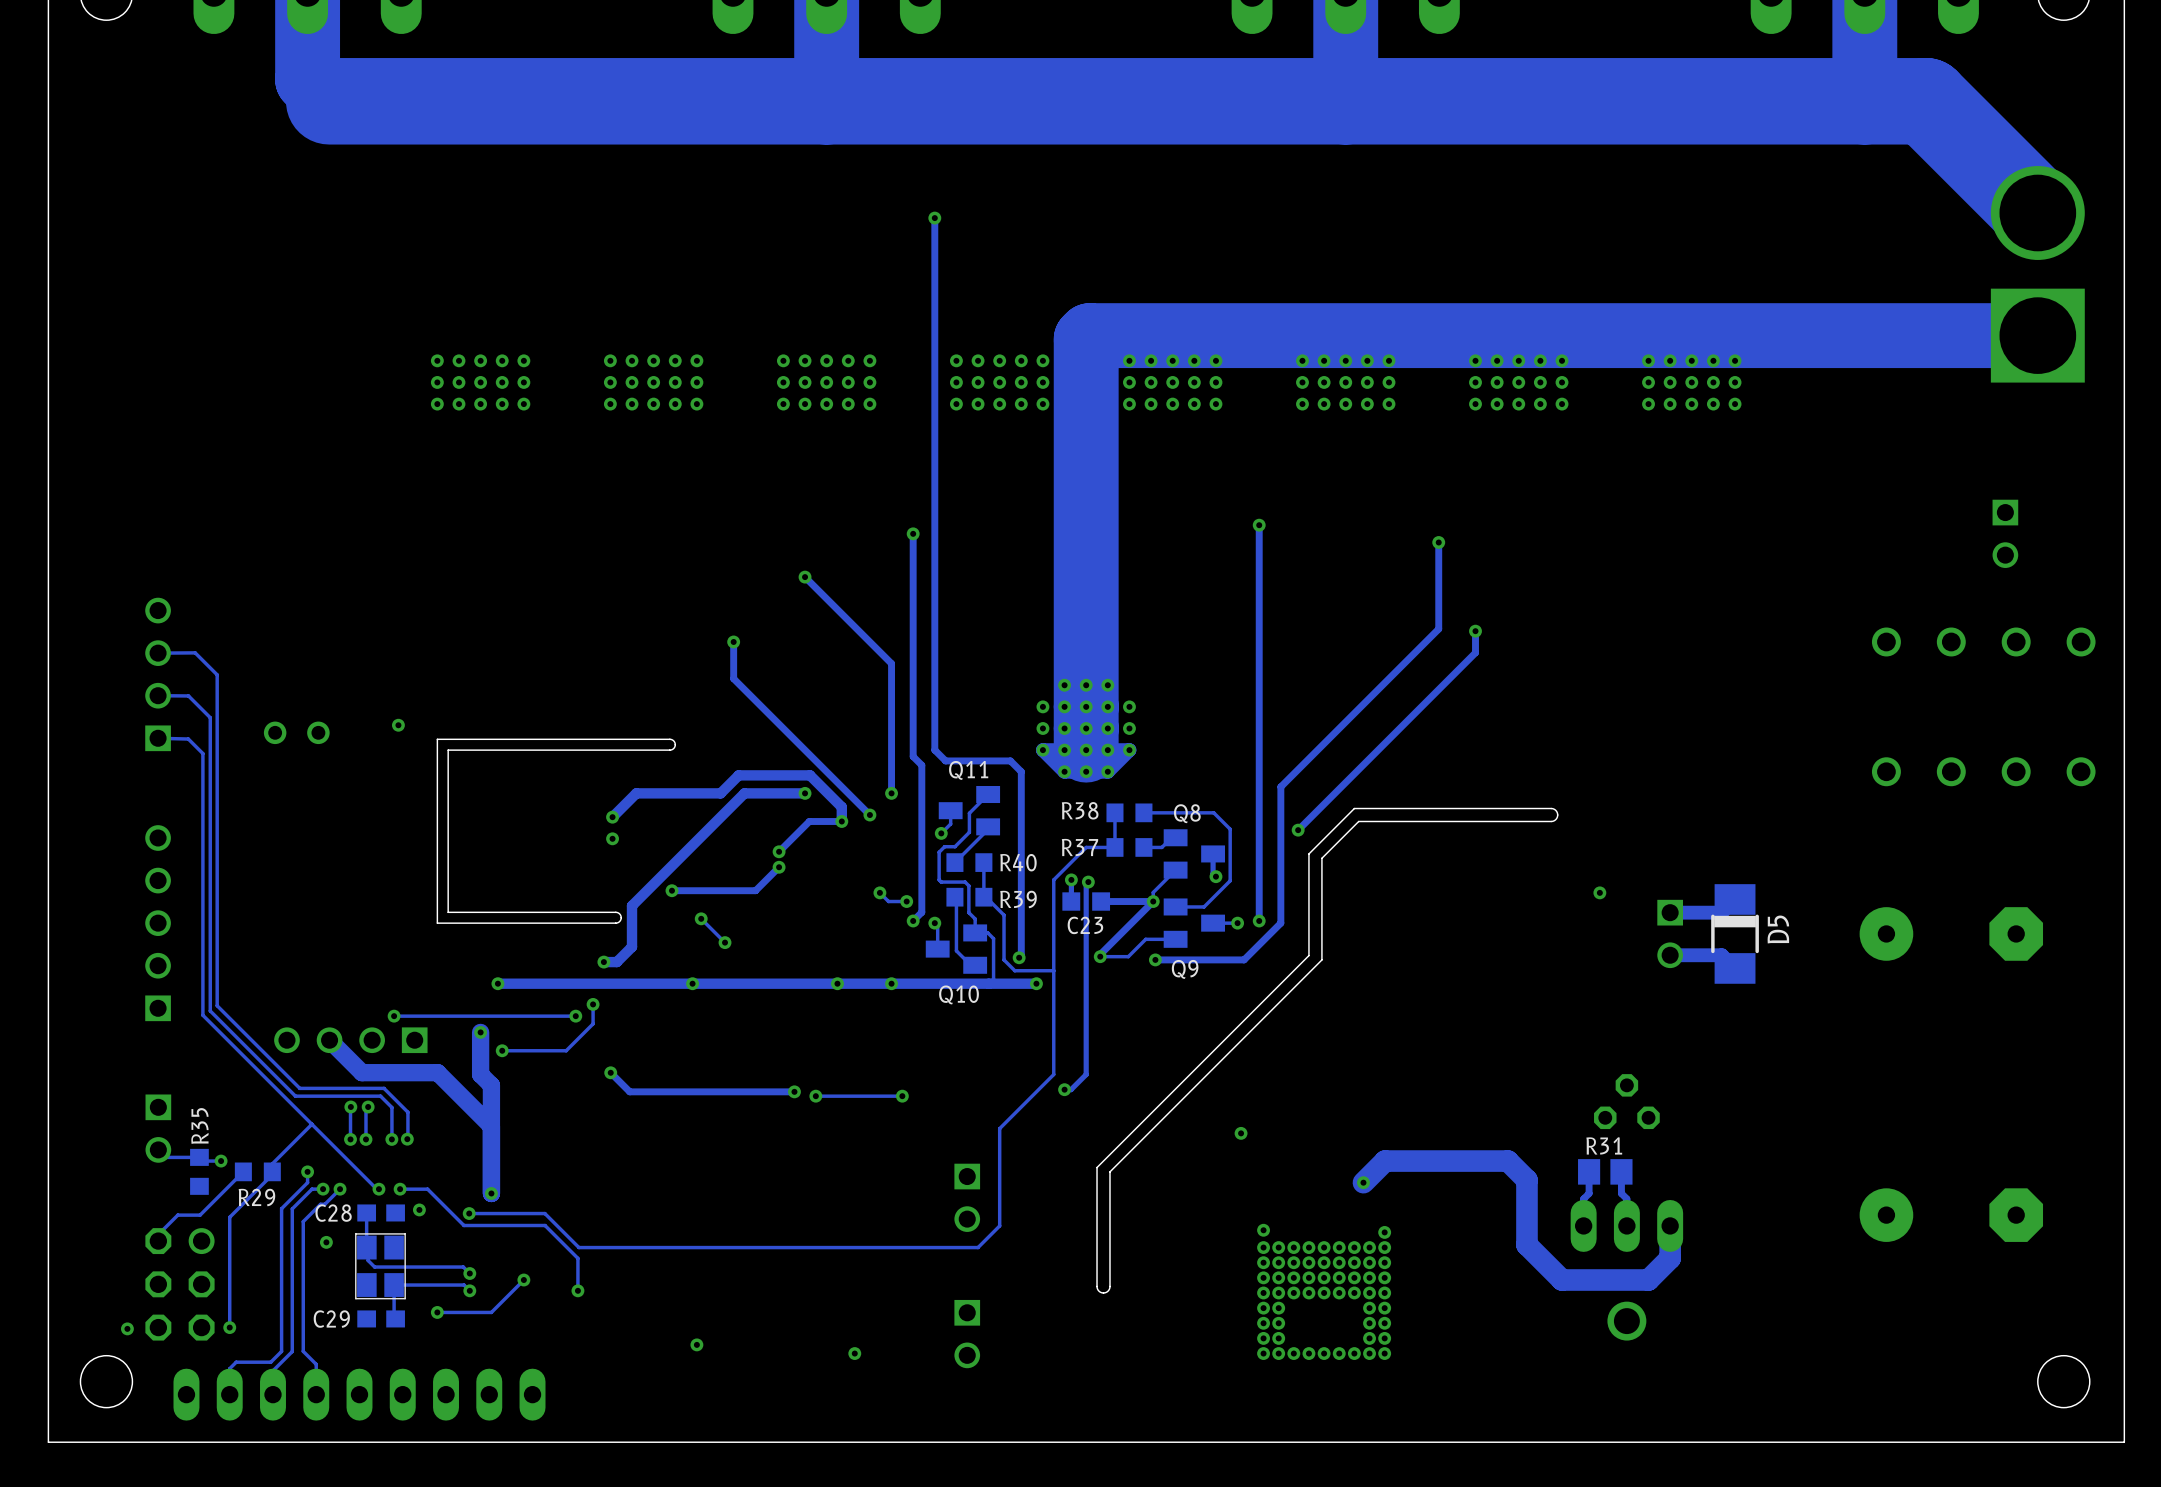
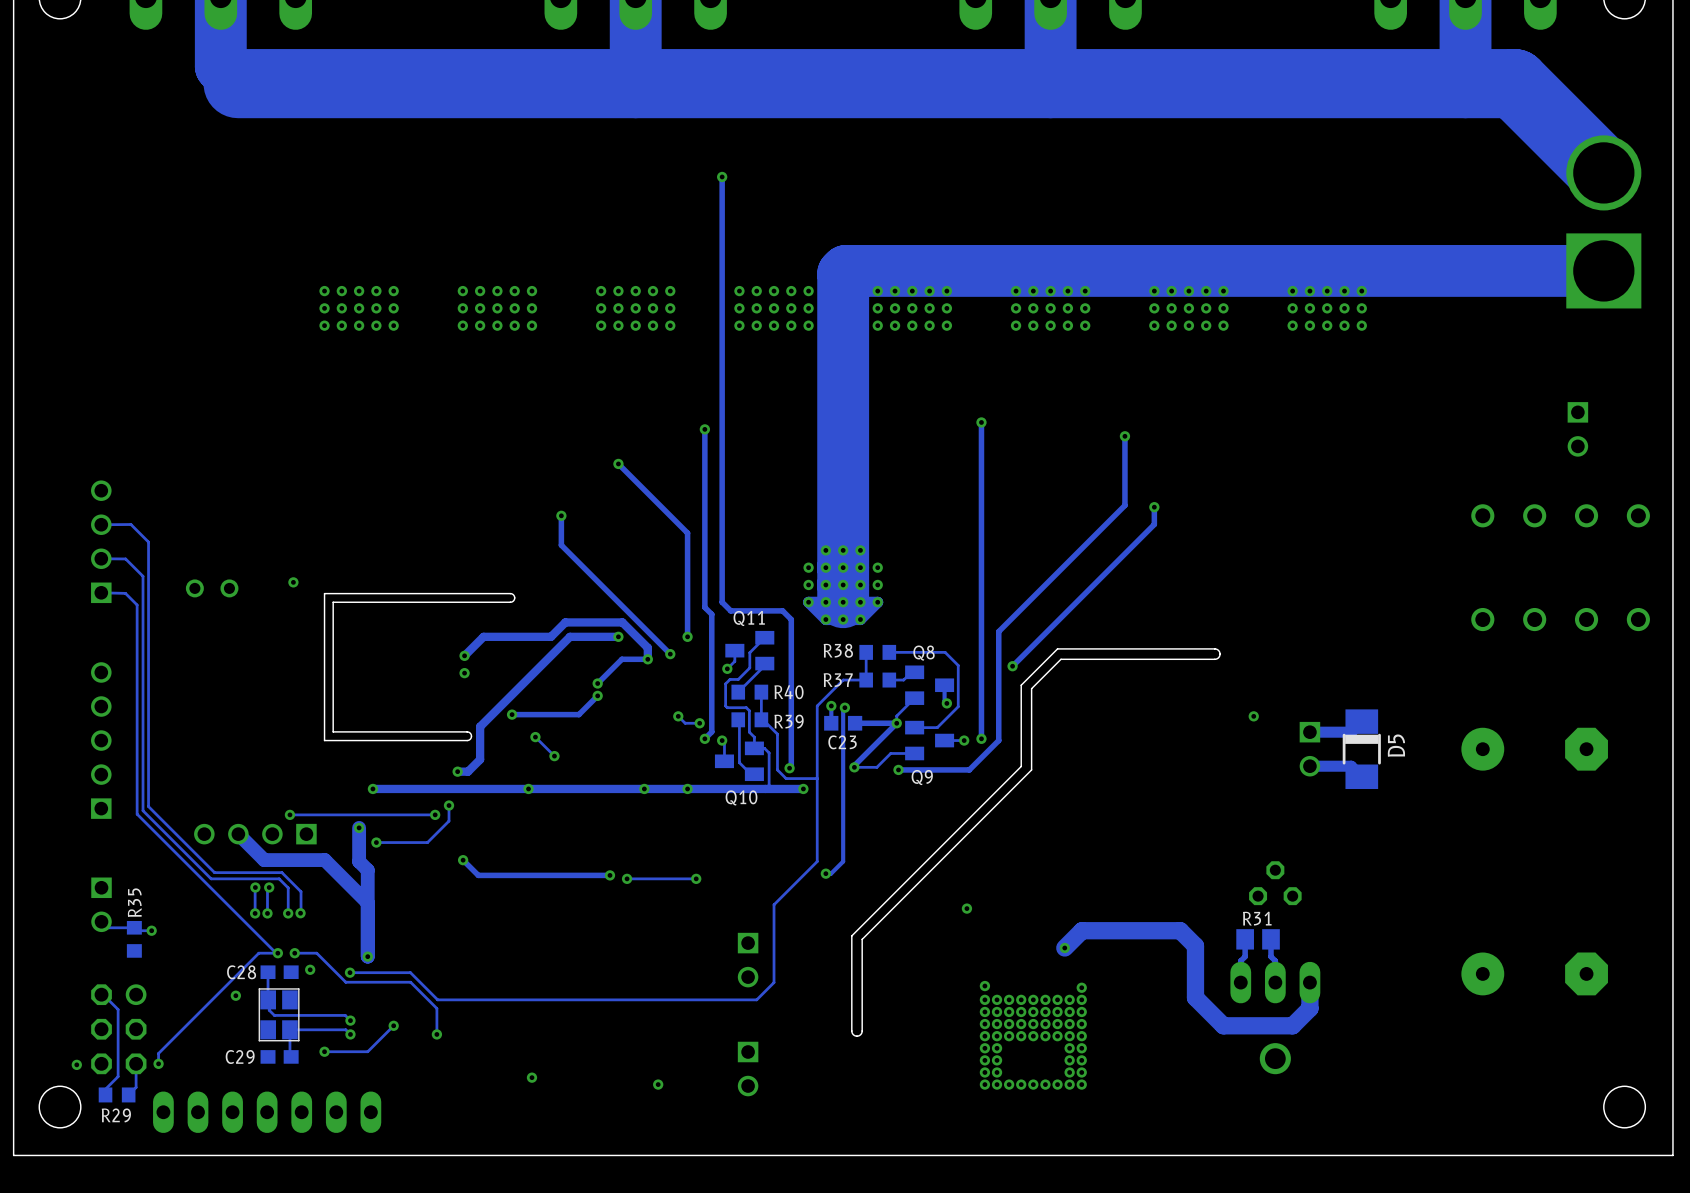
track: (311, 1124) (272, 1163) (272, 1174) (229, 1217) (229, 1314) -> (276, 953) (258, 953) (158, 1053)
track: (243, 1171) (200, 1215) (177, 1215) (158, 1234) (158, 1241) -> (105, 1094) (105, 1089) (118, 1076) (118, 1009) (101, 994)
R29 position: (257, 1171) -> (117, 1094)
track: (307, 1171) (307, 1182) (281, 1208) (281, 1351) (270, 1362) (236, 1362) (229, 1368) (229, 1394) -> none
via: (307, 1171) -> none
track: (323, 1189) (312, 1189) (292, 1208) (292, 1351) (272, 1370) (272, 1394) -> none
via: (323, 1189) -> none
track: (340, 1189) (324, 1204) (320, 1204) (303, 1221) (303, 1351) (316, 1364) (316, 1394) -> none
via: (340, 1189) -> none
track: none -> (136, 1063) (136, 1087) (128, 1094)
part footprint: [173, 1368, 546, 1421] -> [153, 1091, 382, 1133]

